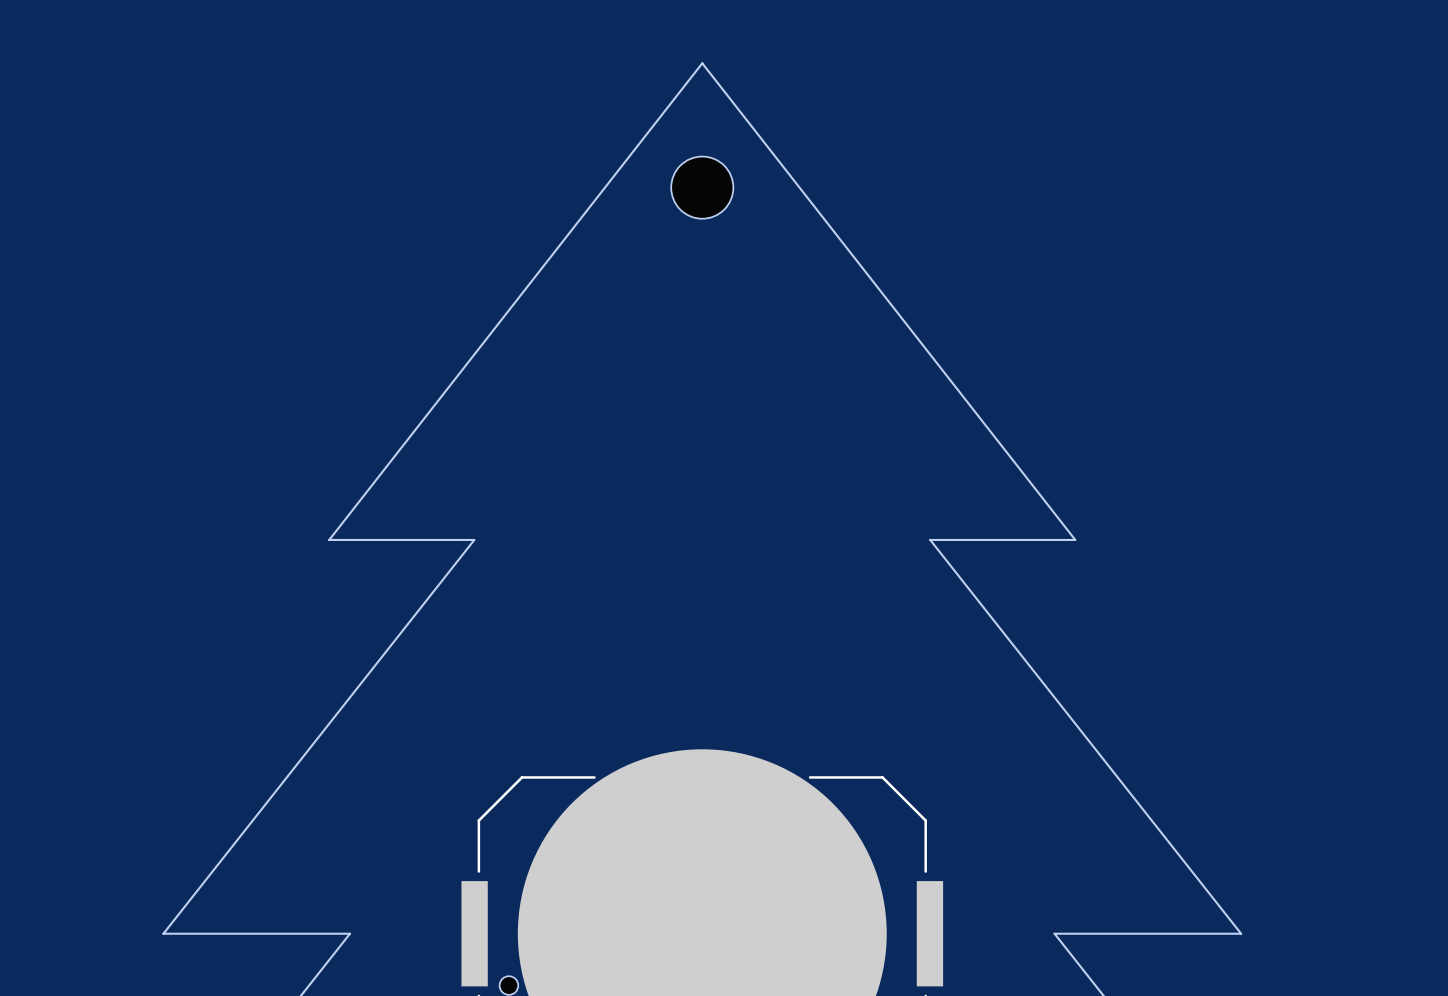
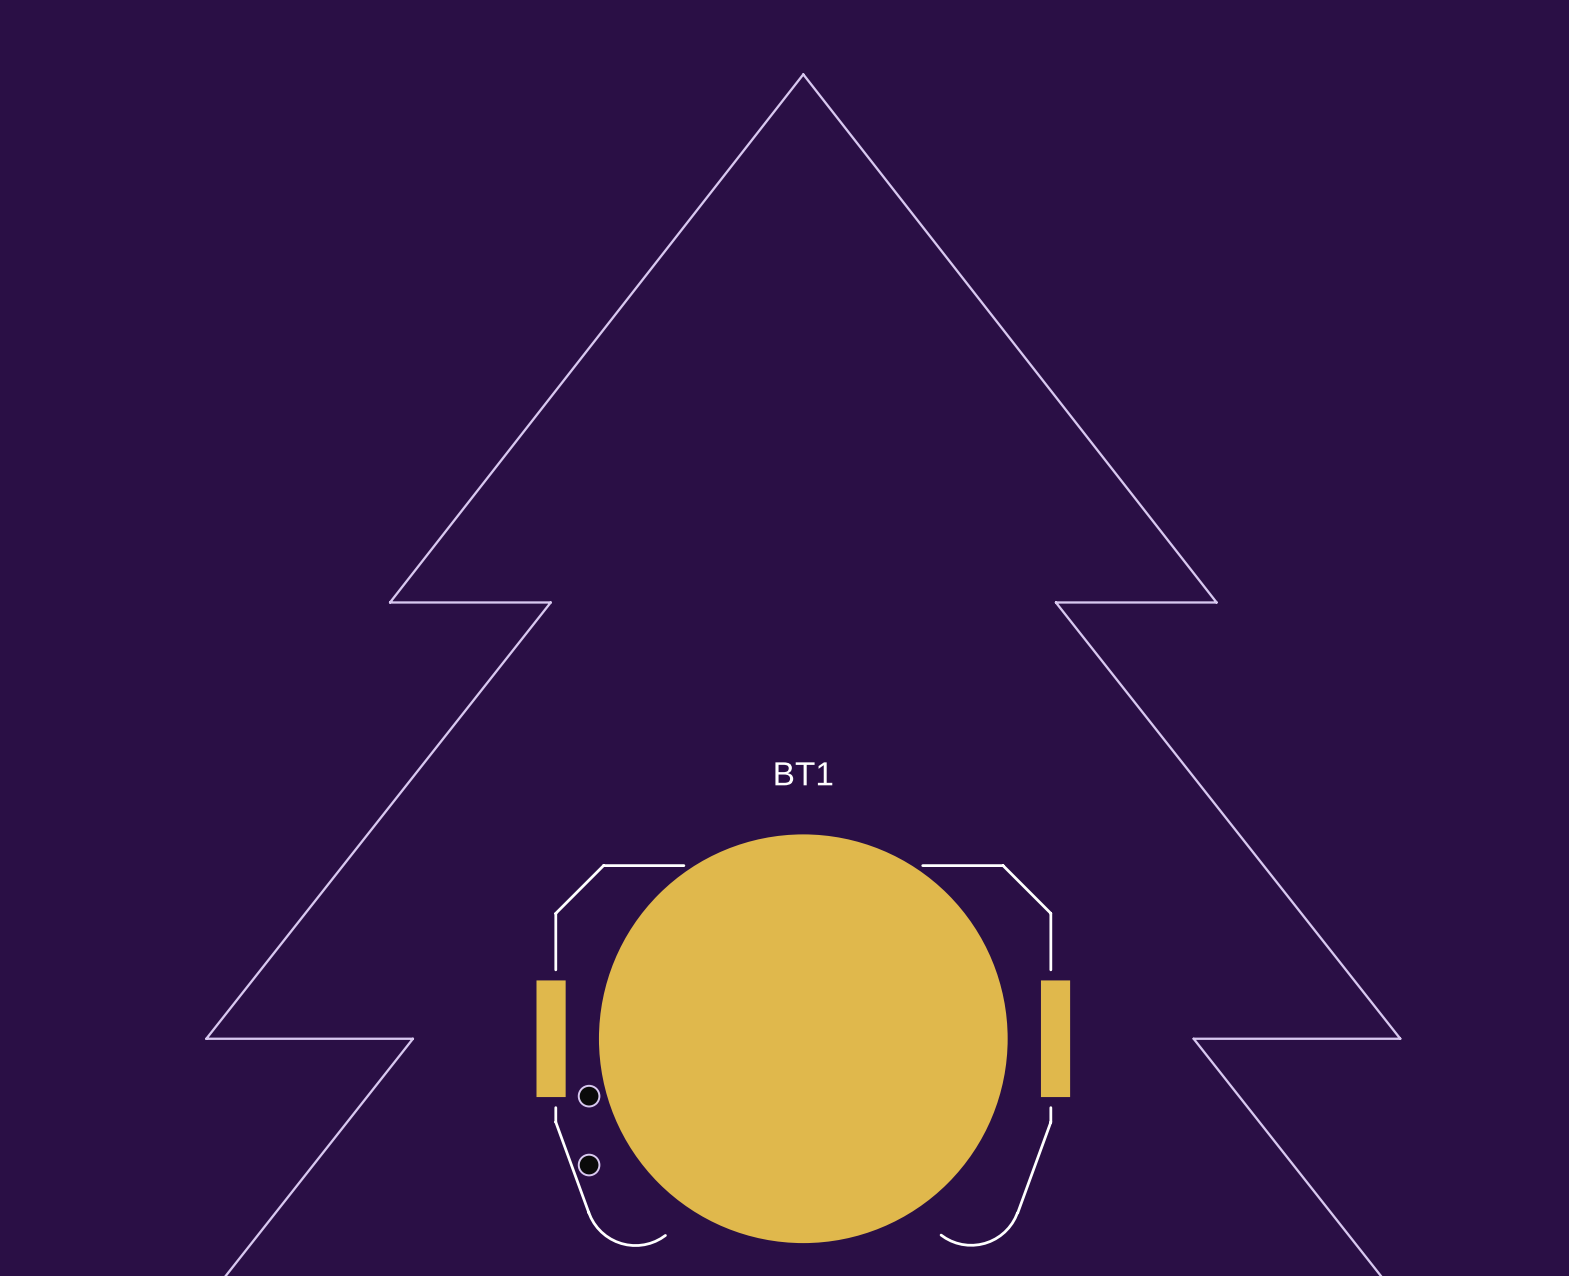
part: (702, 187) -> none
BT1 name: none -> BT1 (803, 773)

